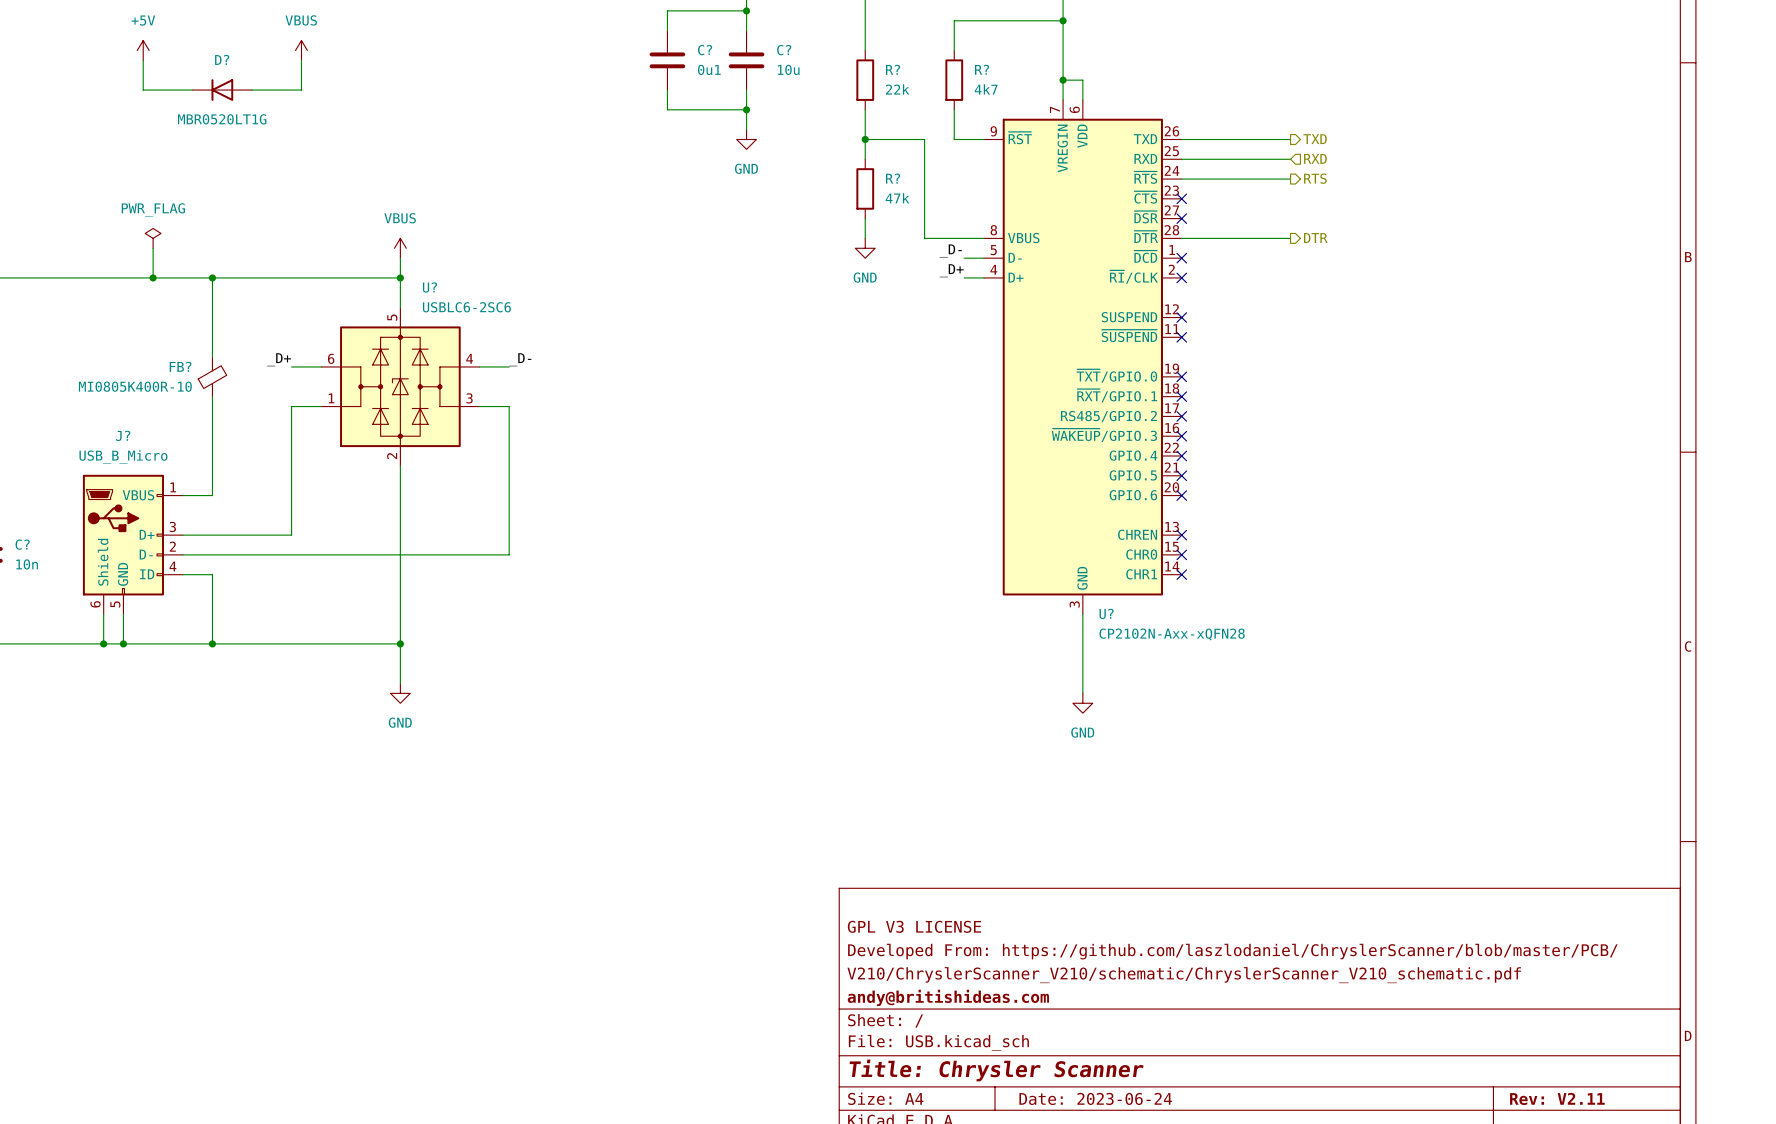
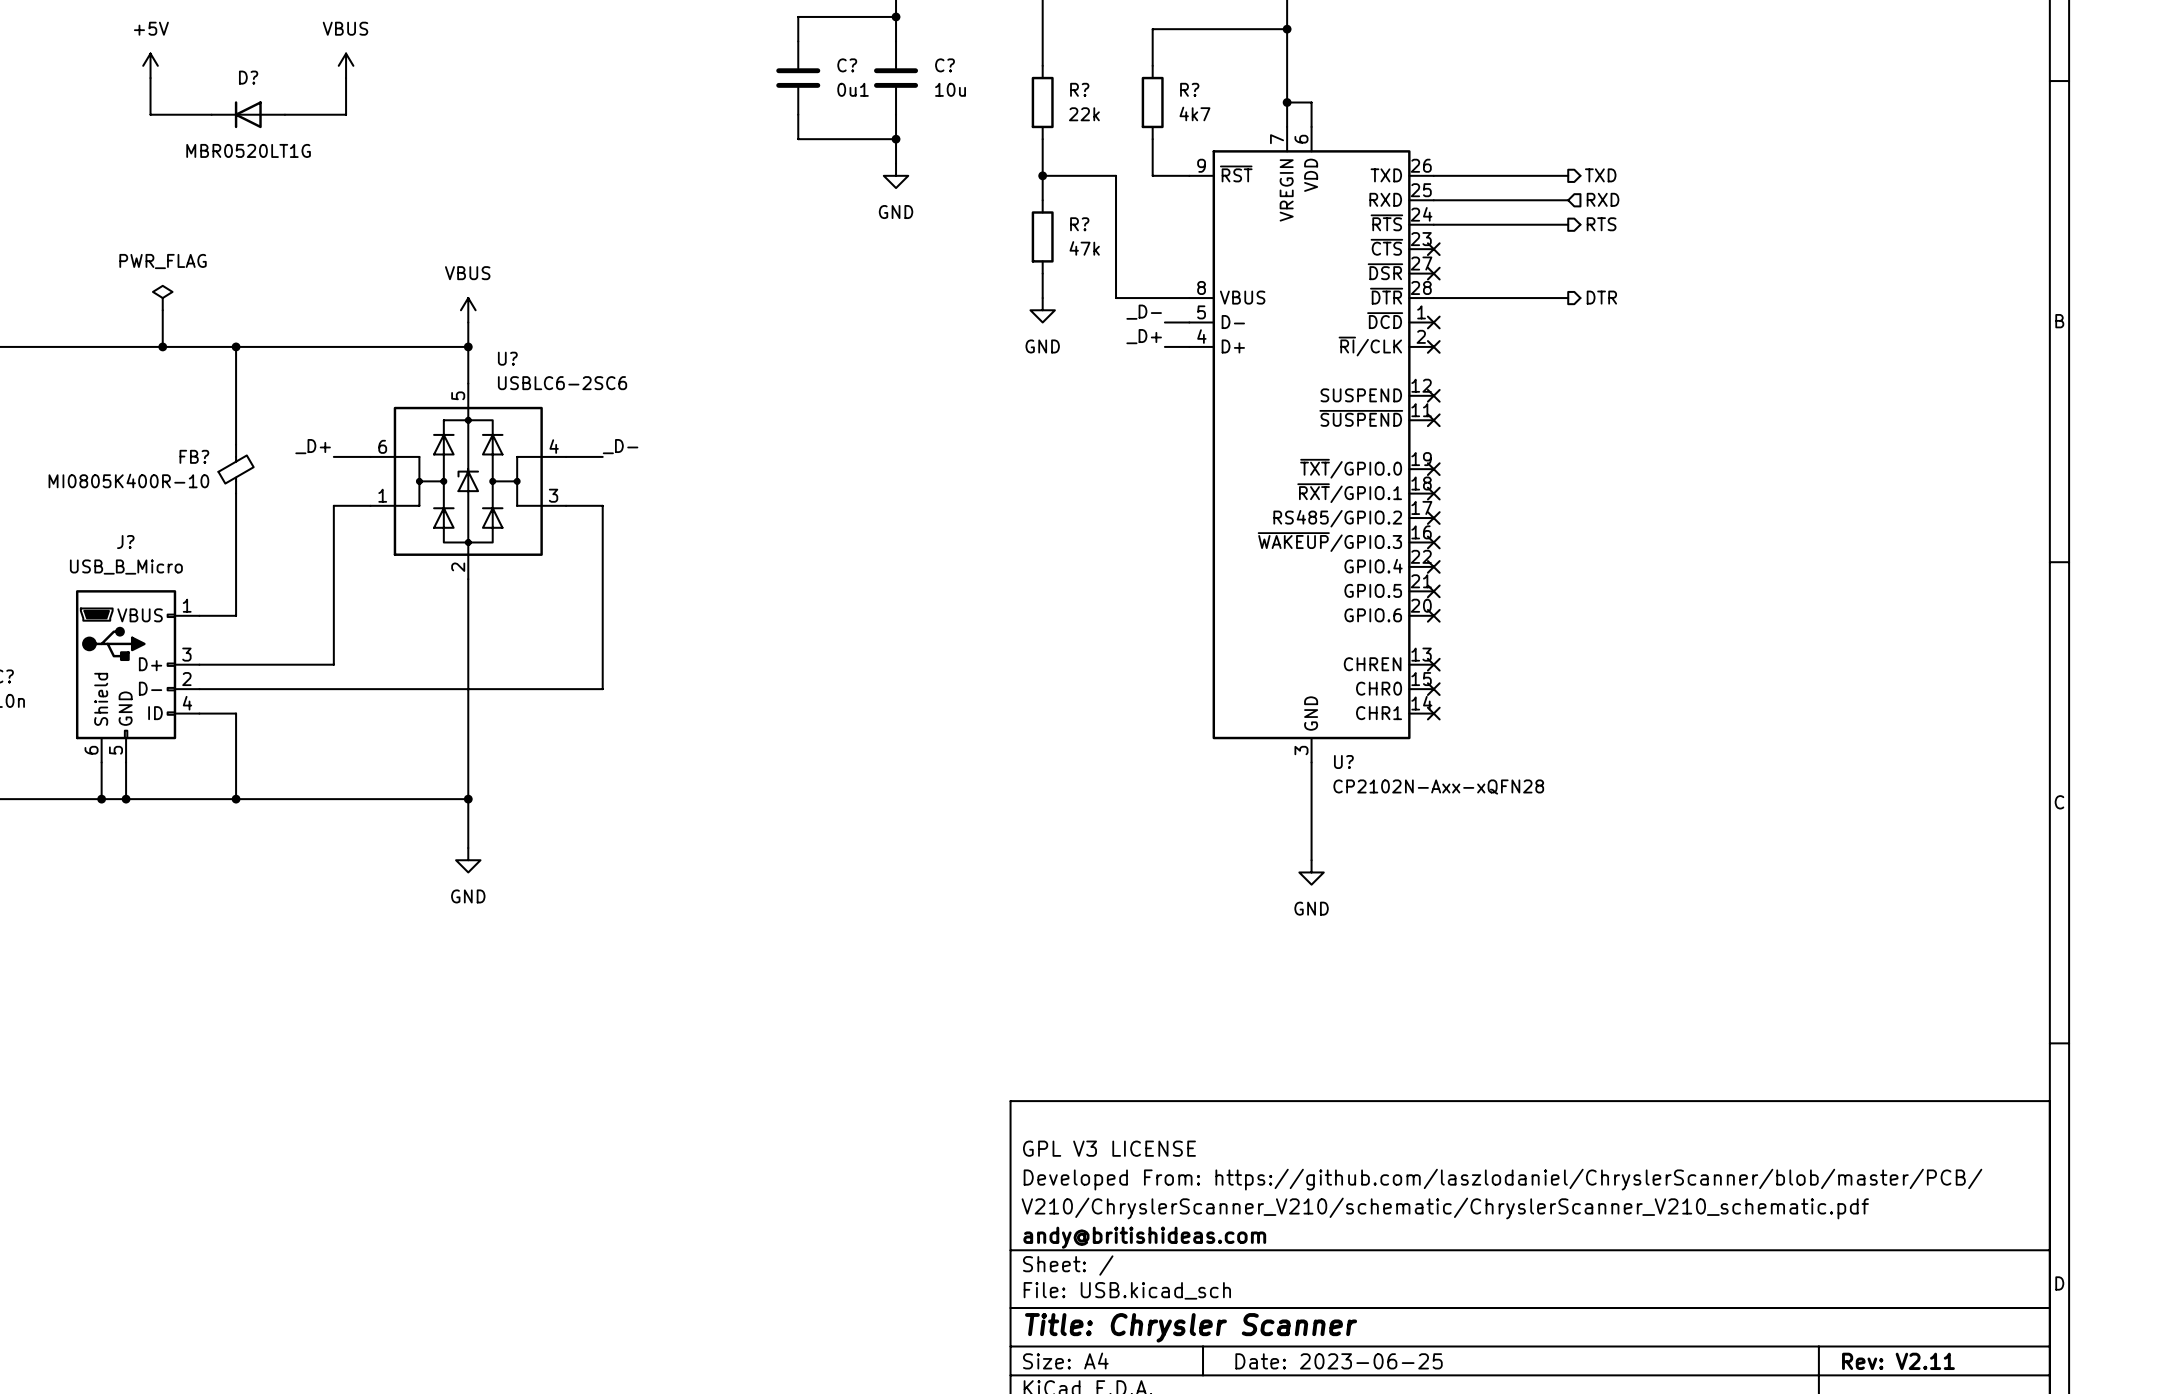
title block: Date: 2023-06-24 (1095, 1098) -> Date: 2023-06-25 (1339, 1361)

